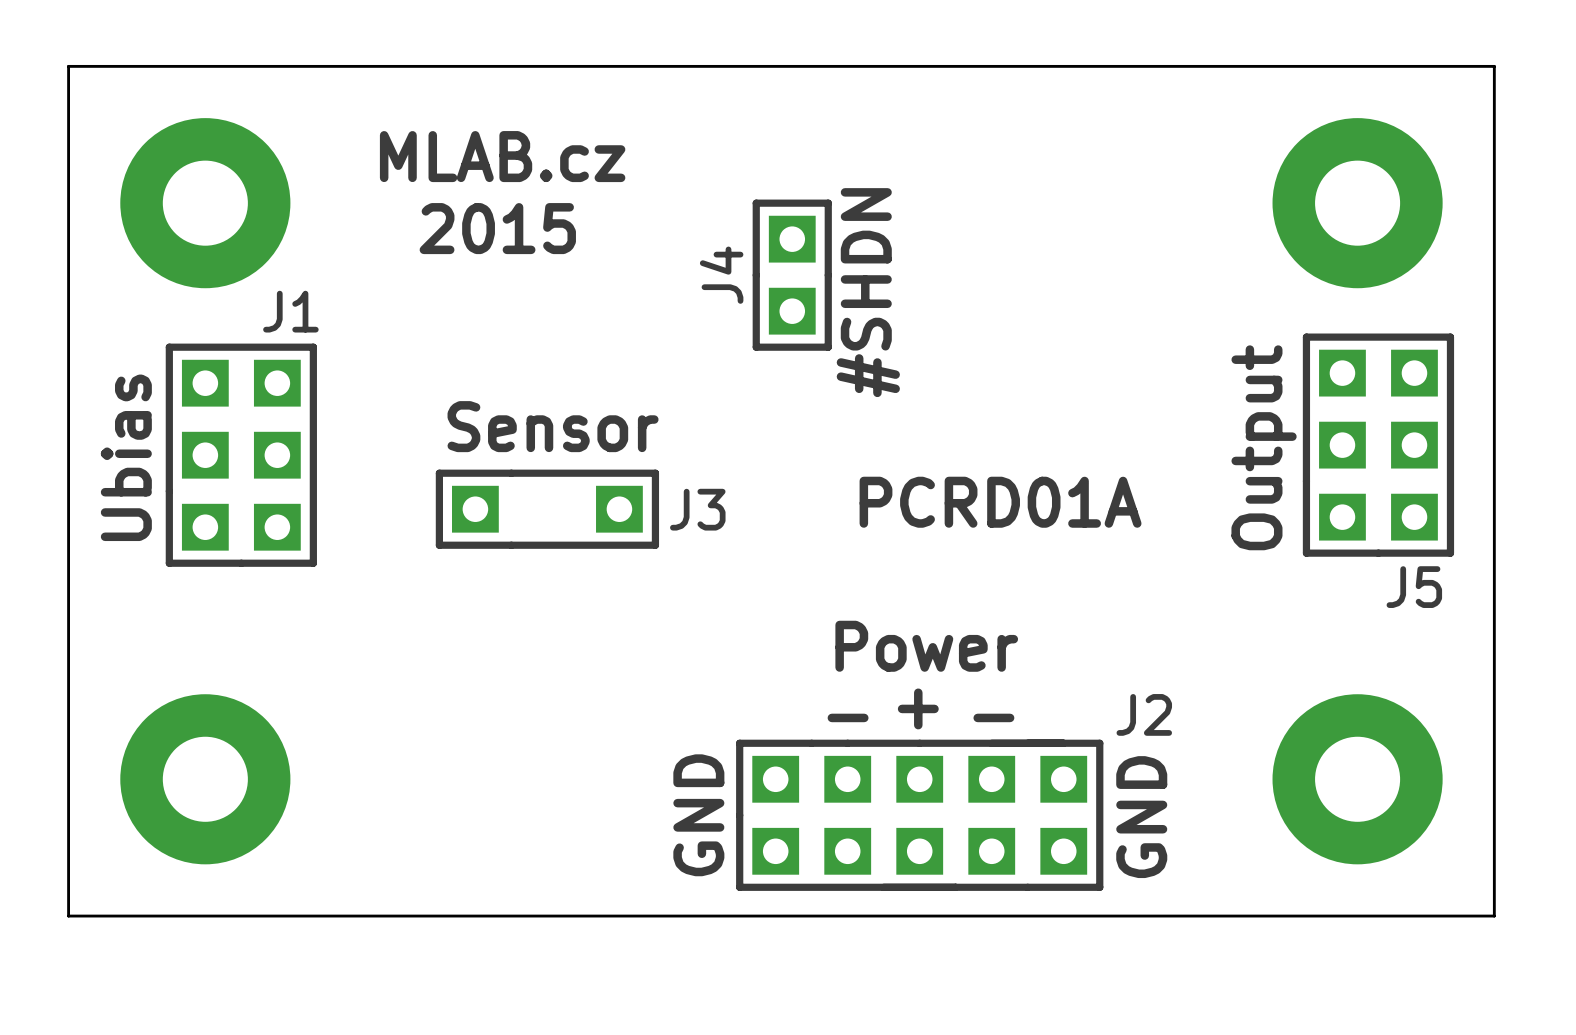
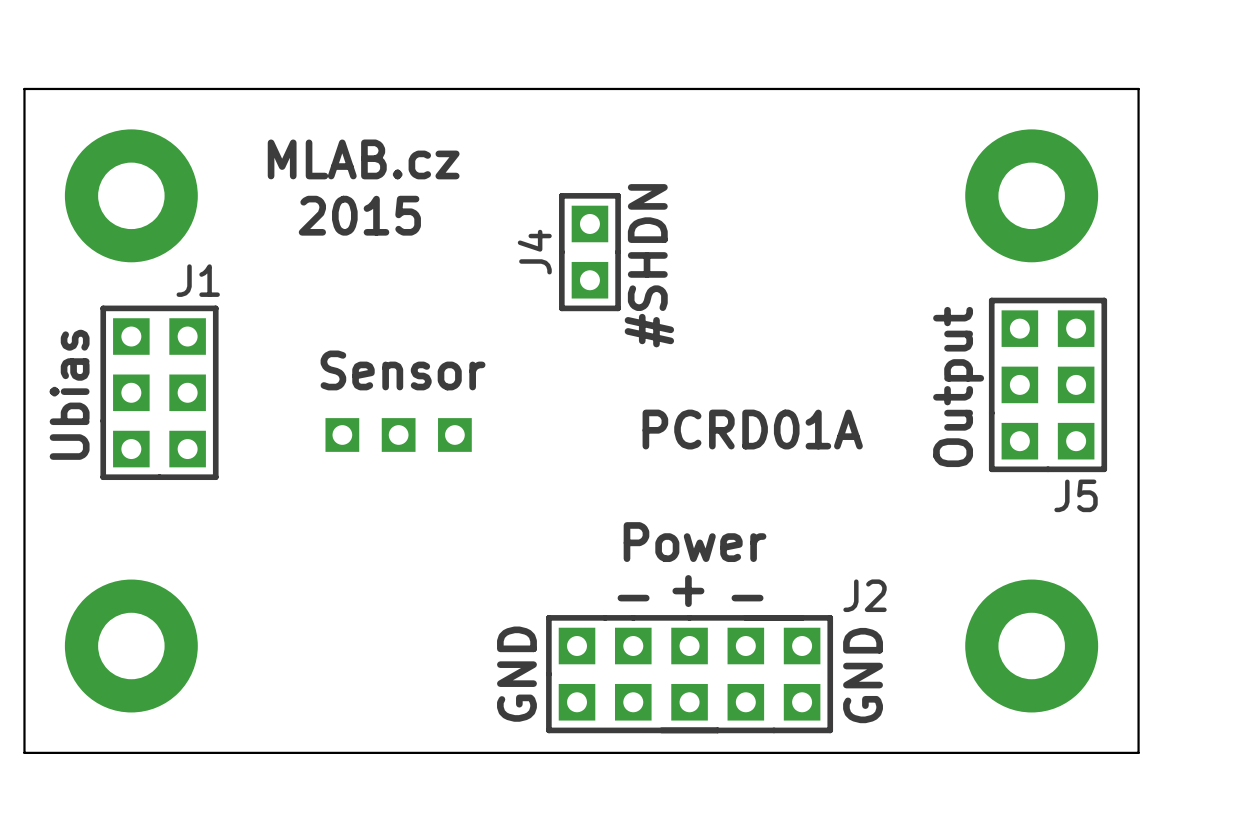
J3: (547, 509) -> none
part: none -> (398, 434)

